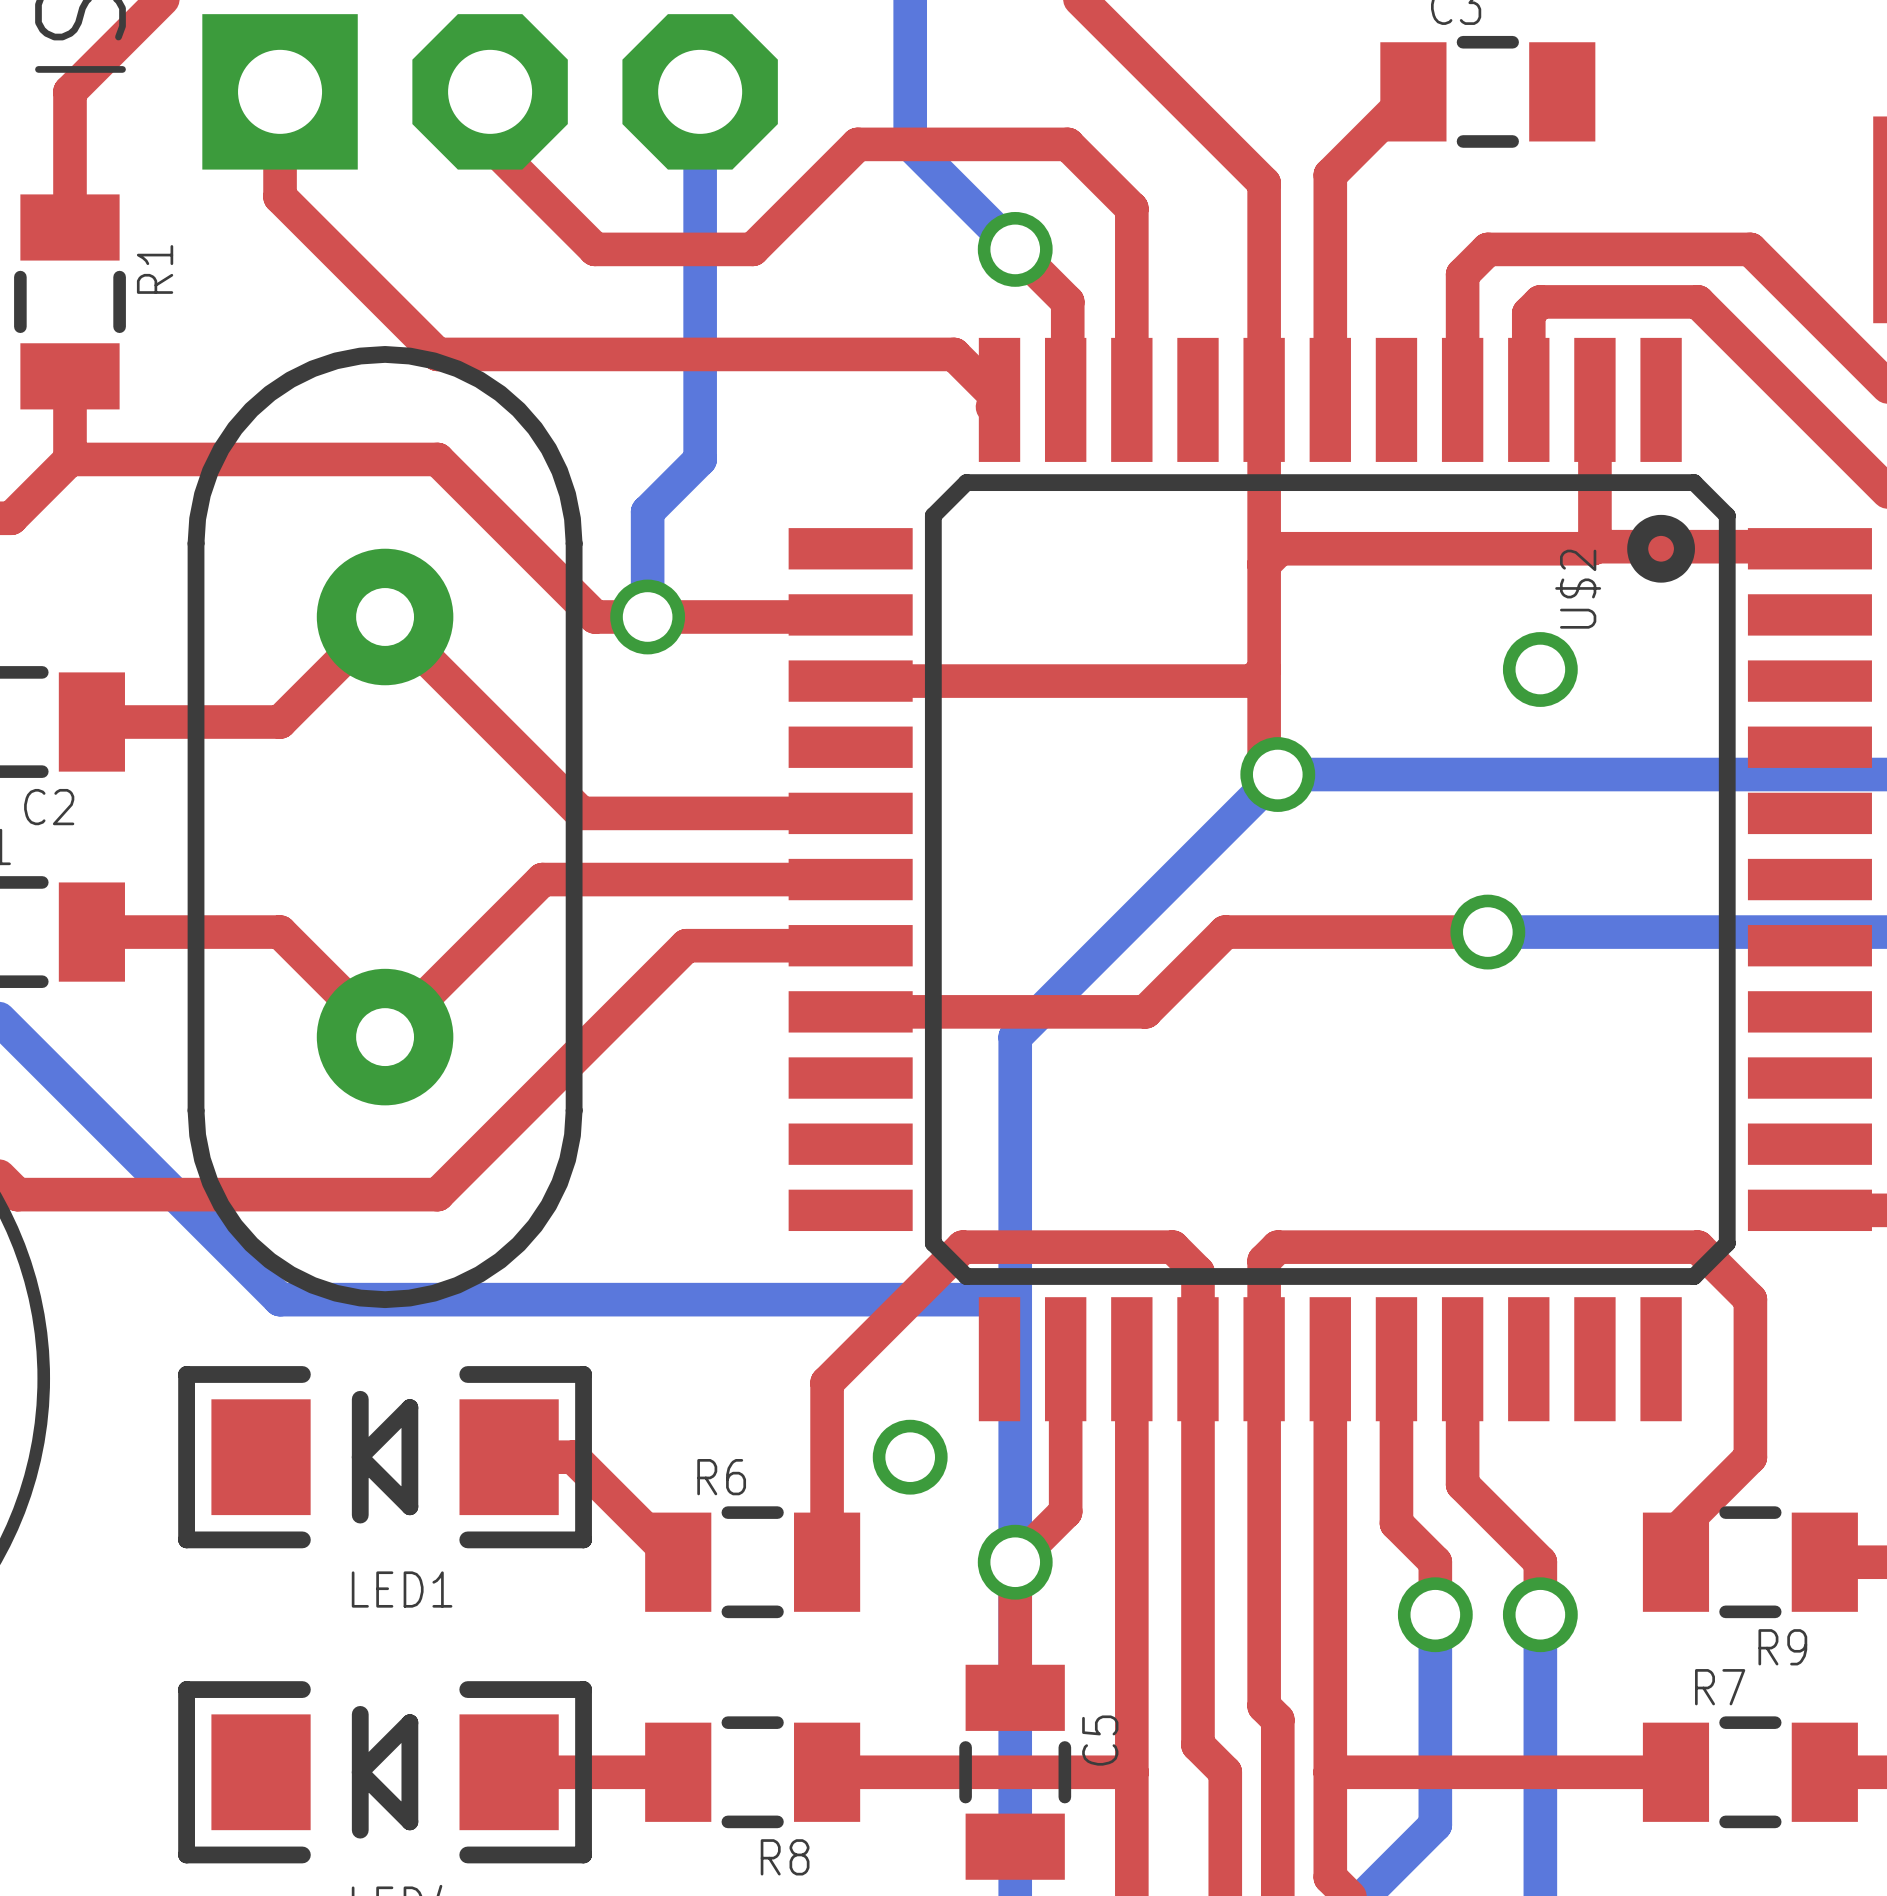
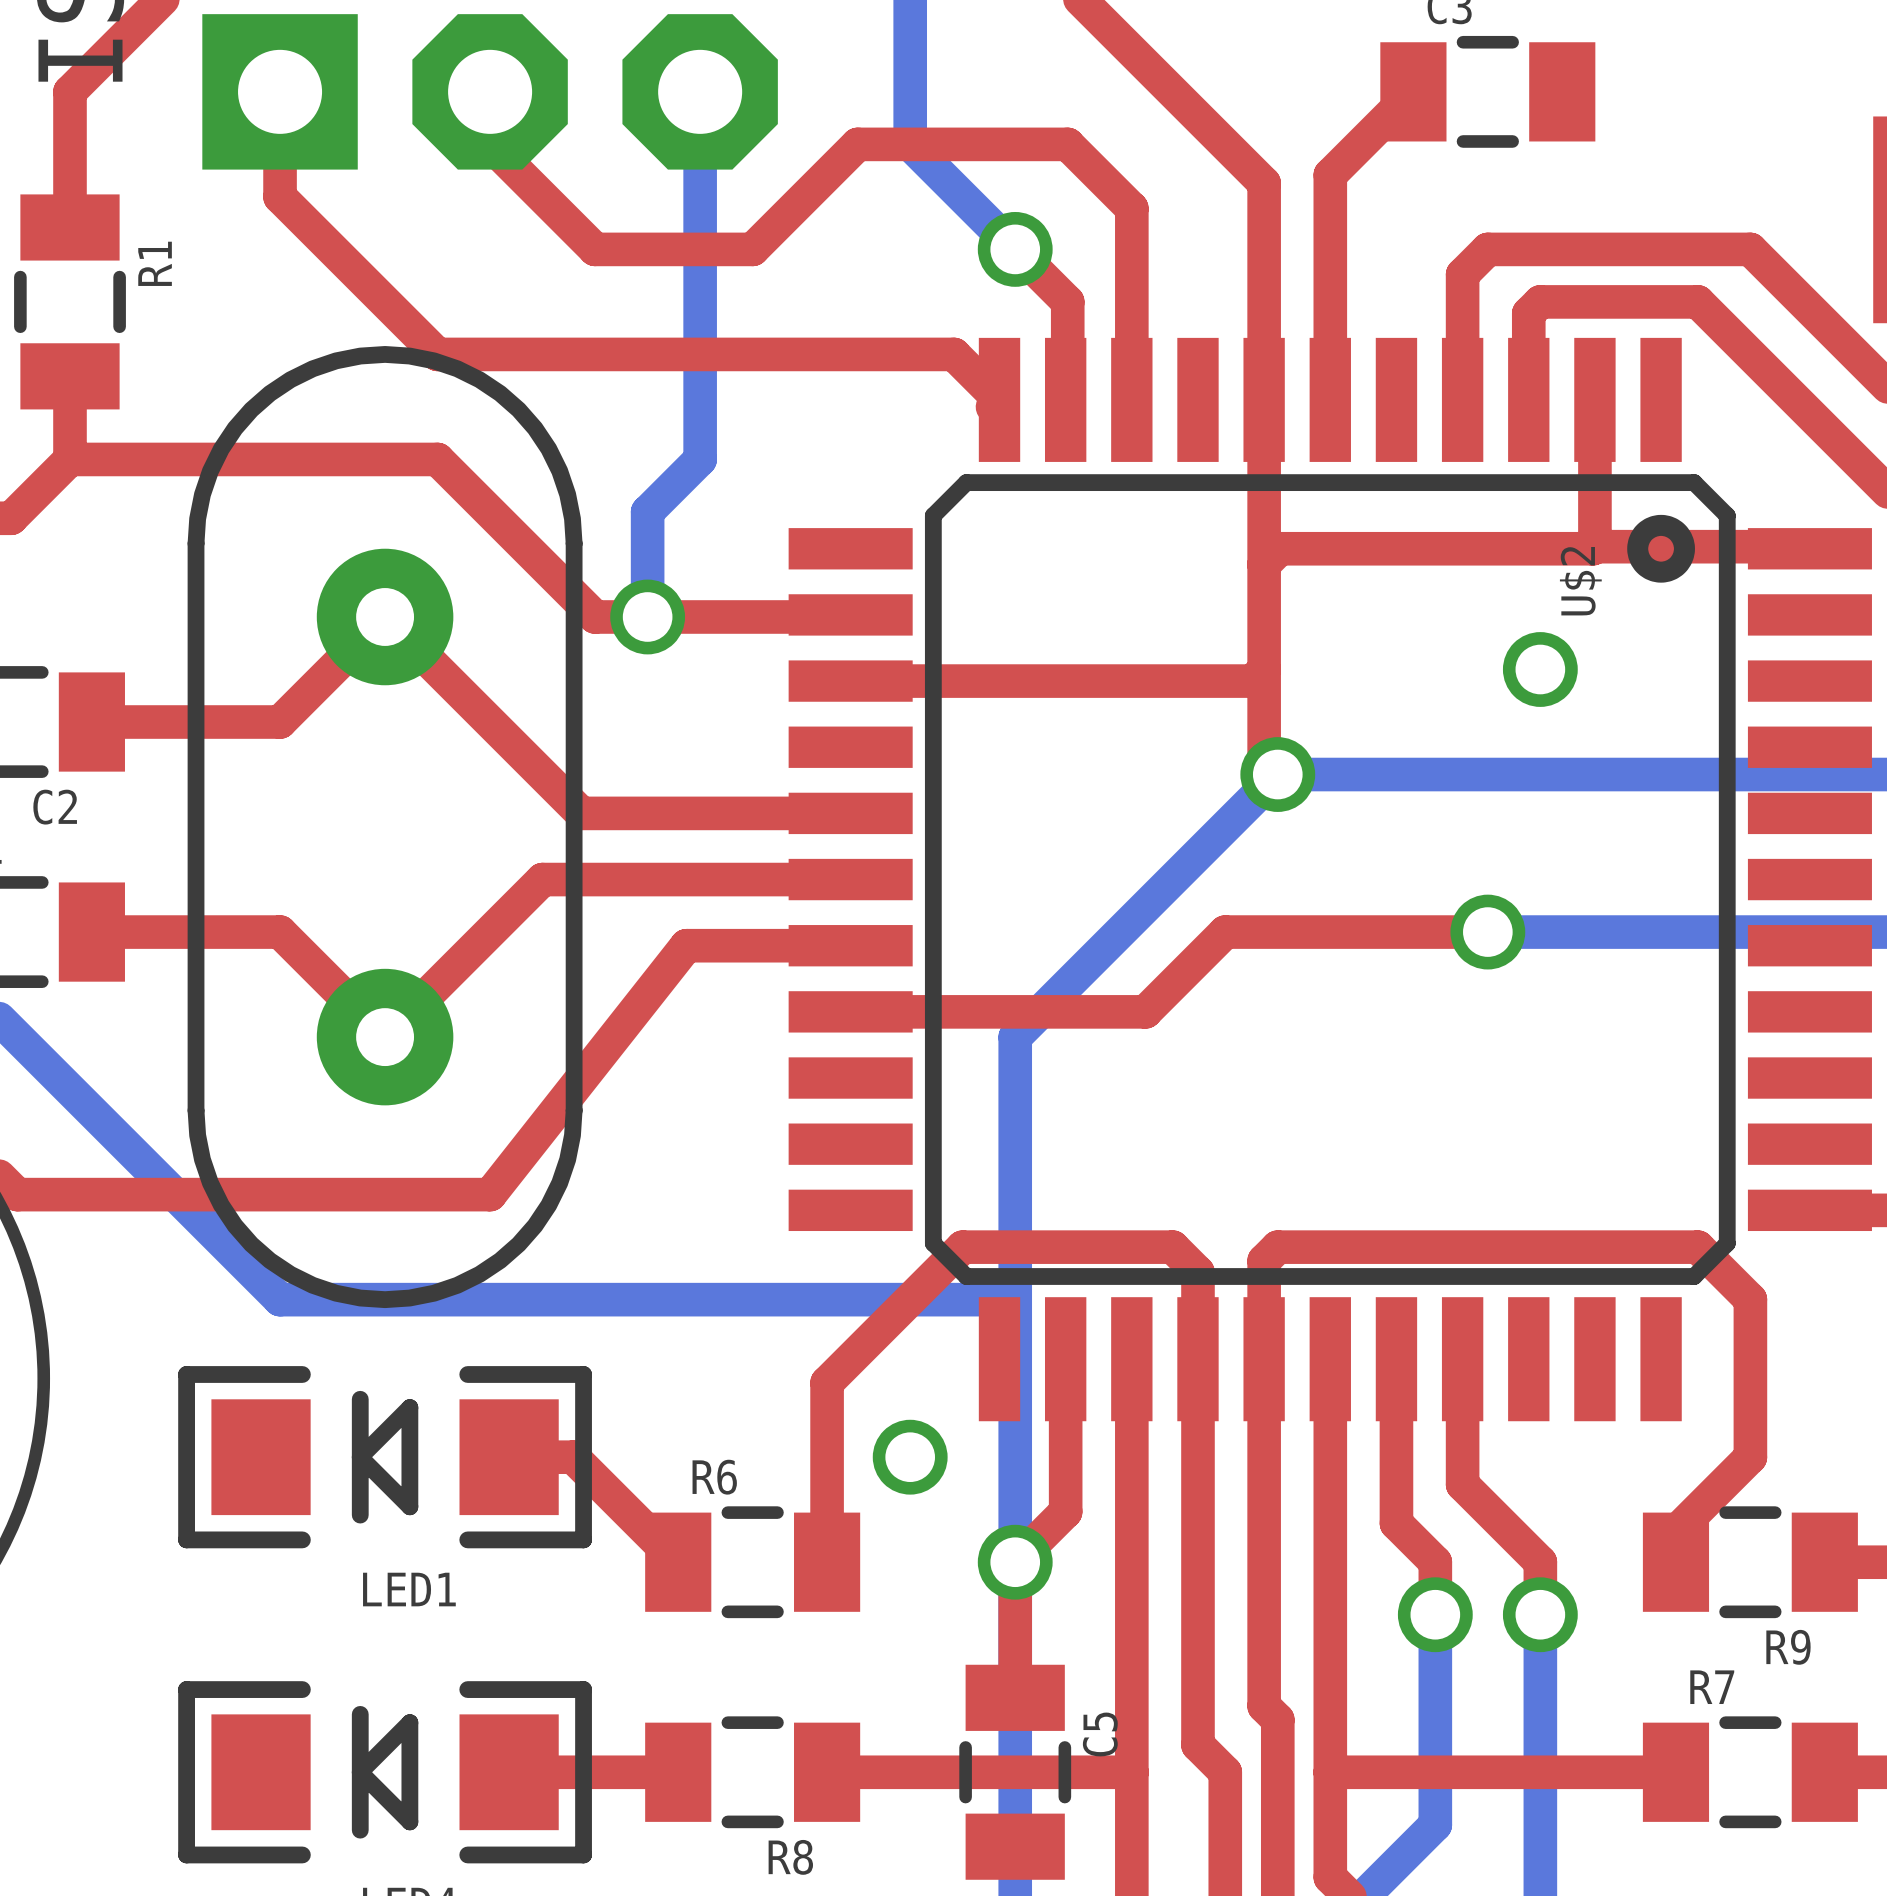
top track: (686, 945) (437, 1194) -> (686, 945) (490, 1194) (437, 1194)

